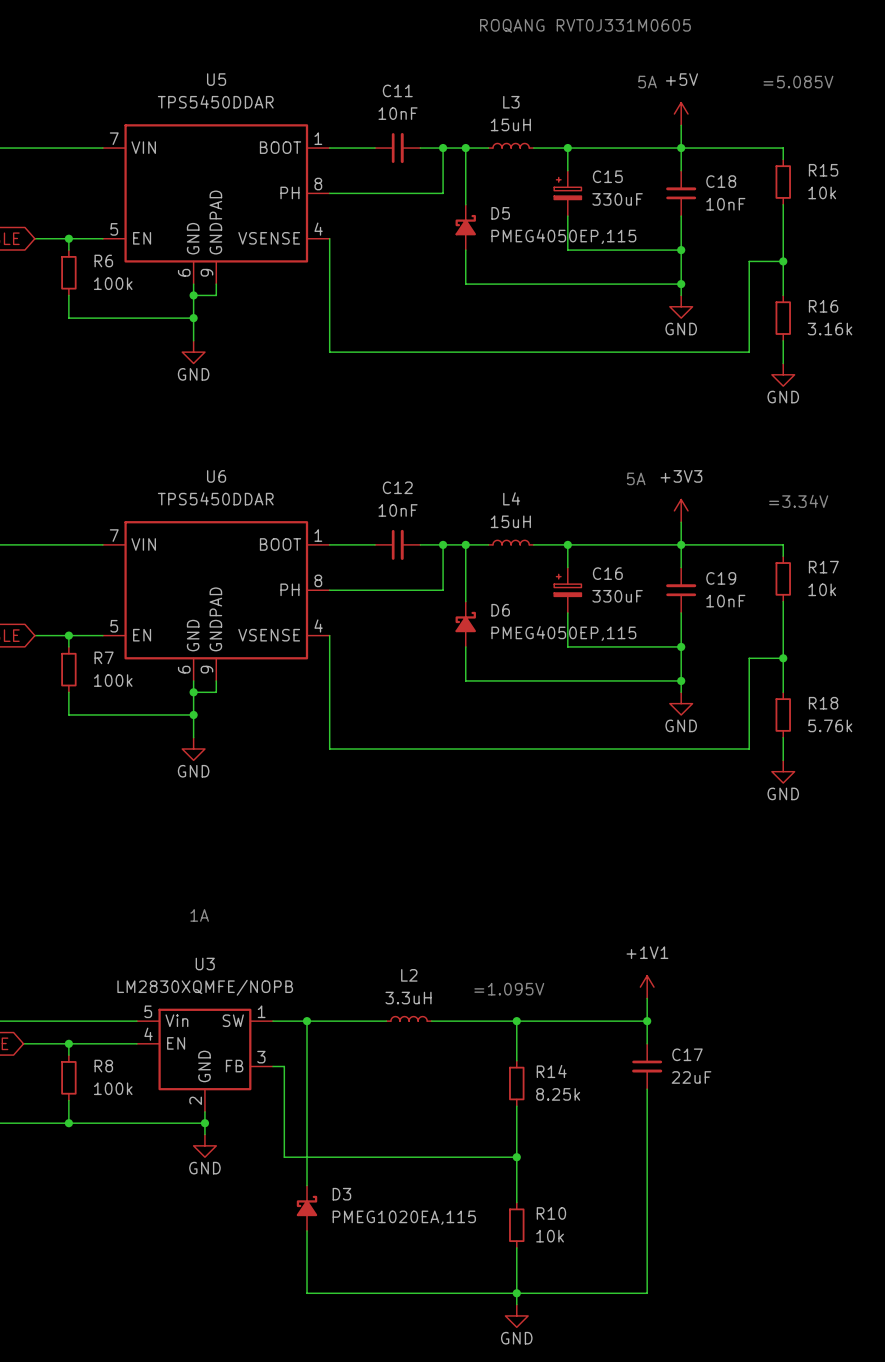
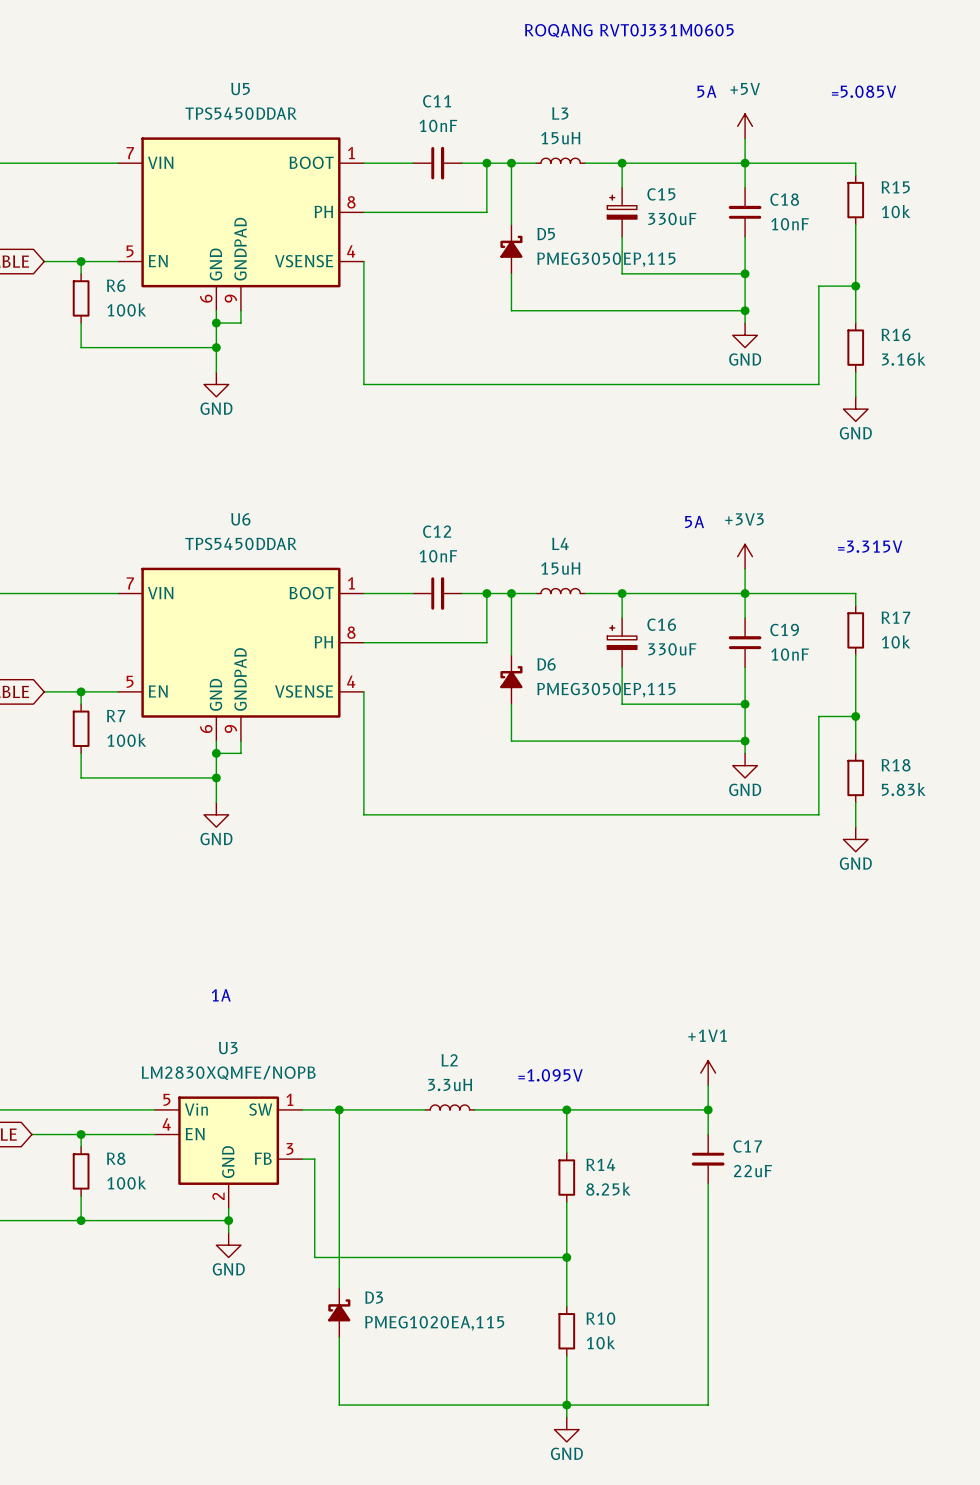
D5 value: PMEG4050EP,115 (563, 236) -> PMEG3050EP,115 (606, 259)
text: =3.34V (798, 501) -> =3.315V (870, 546)
D6 value: PMEG4050EP,115 (563, 633) -> PMEG3050EP,115 (606, 690)
R18 value: 5.76k (830, 725) -> 5.83k (903, 789)

